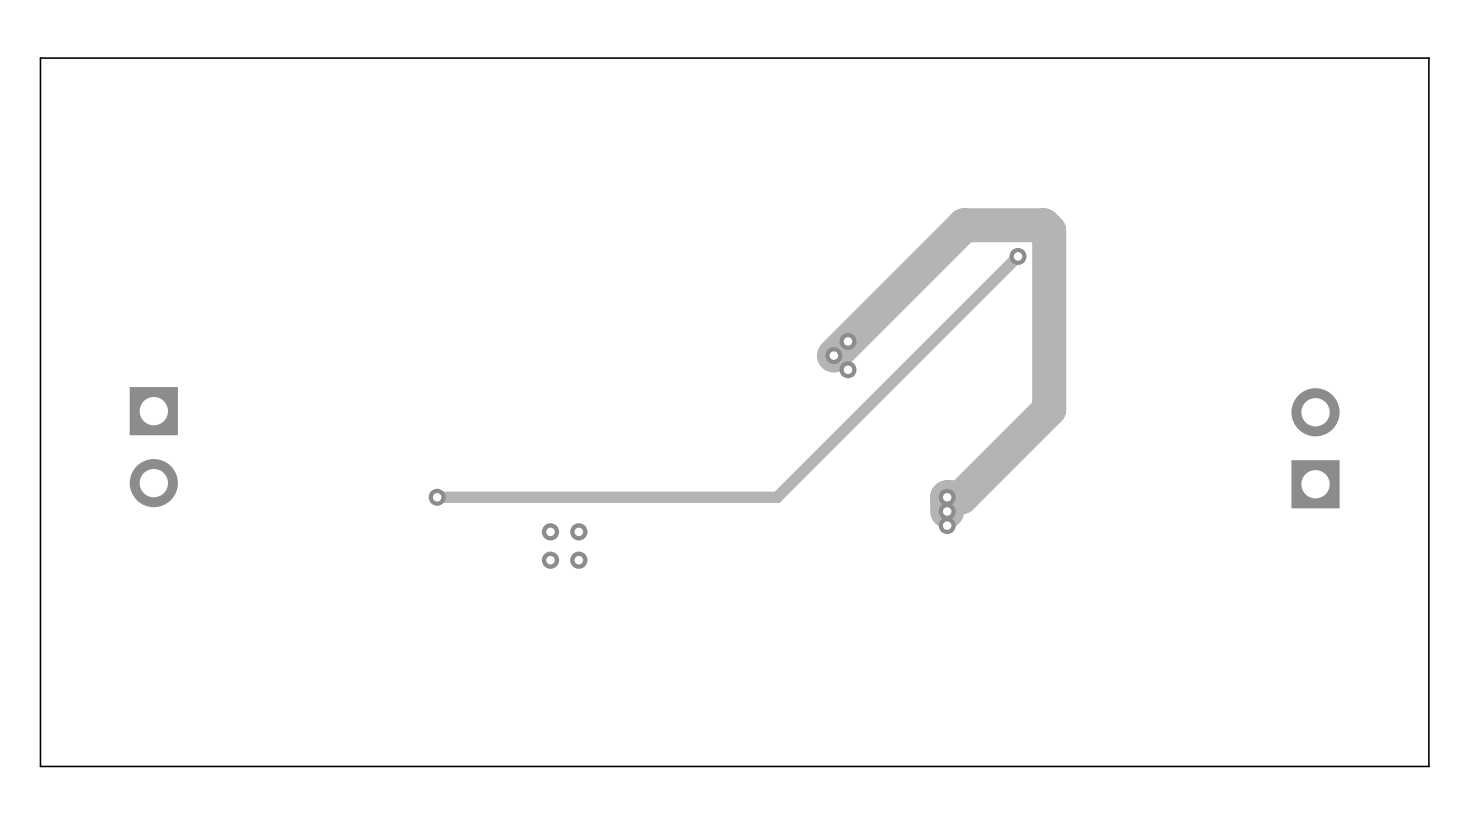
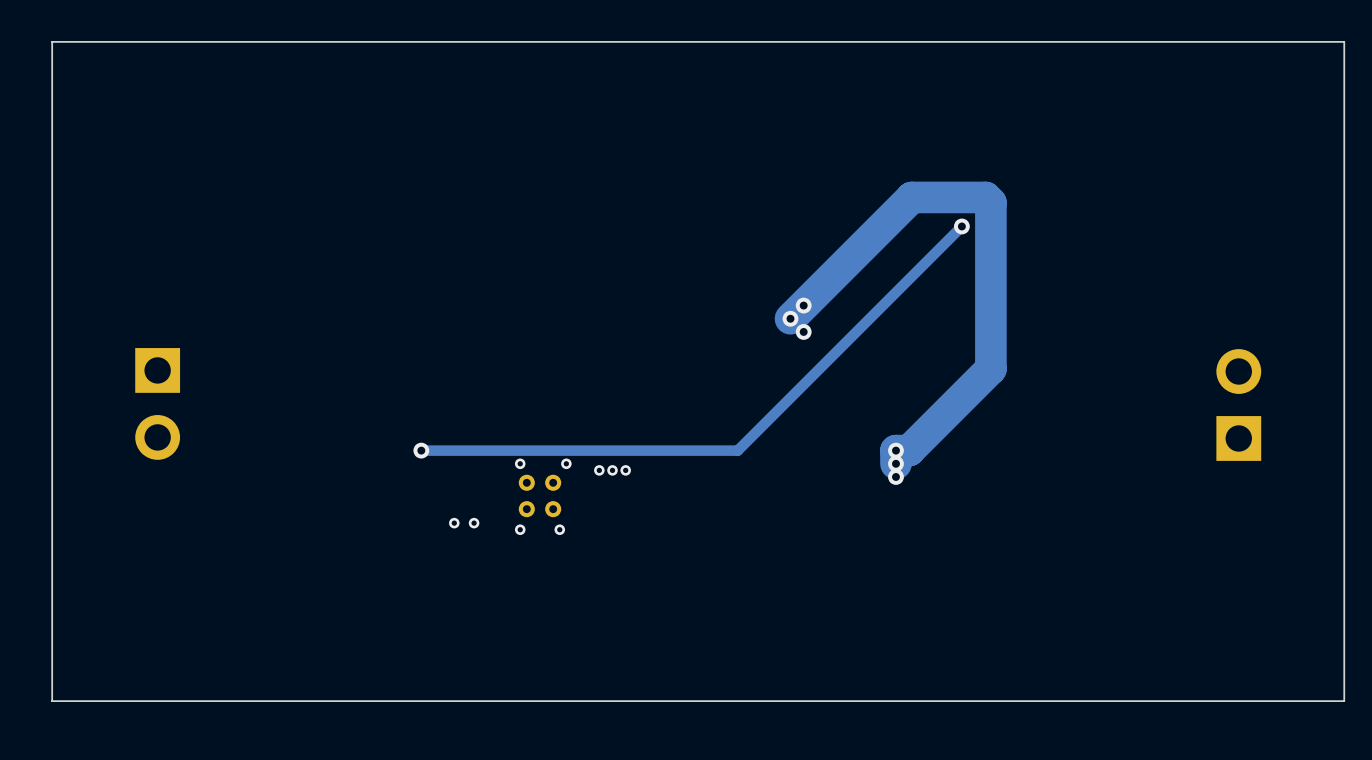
via: none -> (520, 463)
via: none -> (566, 463)
via: none -> (599, 470)
via: none -> (612, 470)
via: none -> (625, 470)
via: none -> (454, 523)
via: none -> (474, 523)
via: none -> (520, 529)
via: none -> (559, 529)

